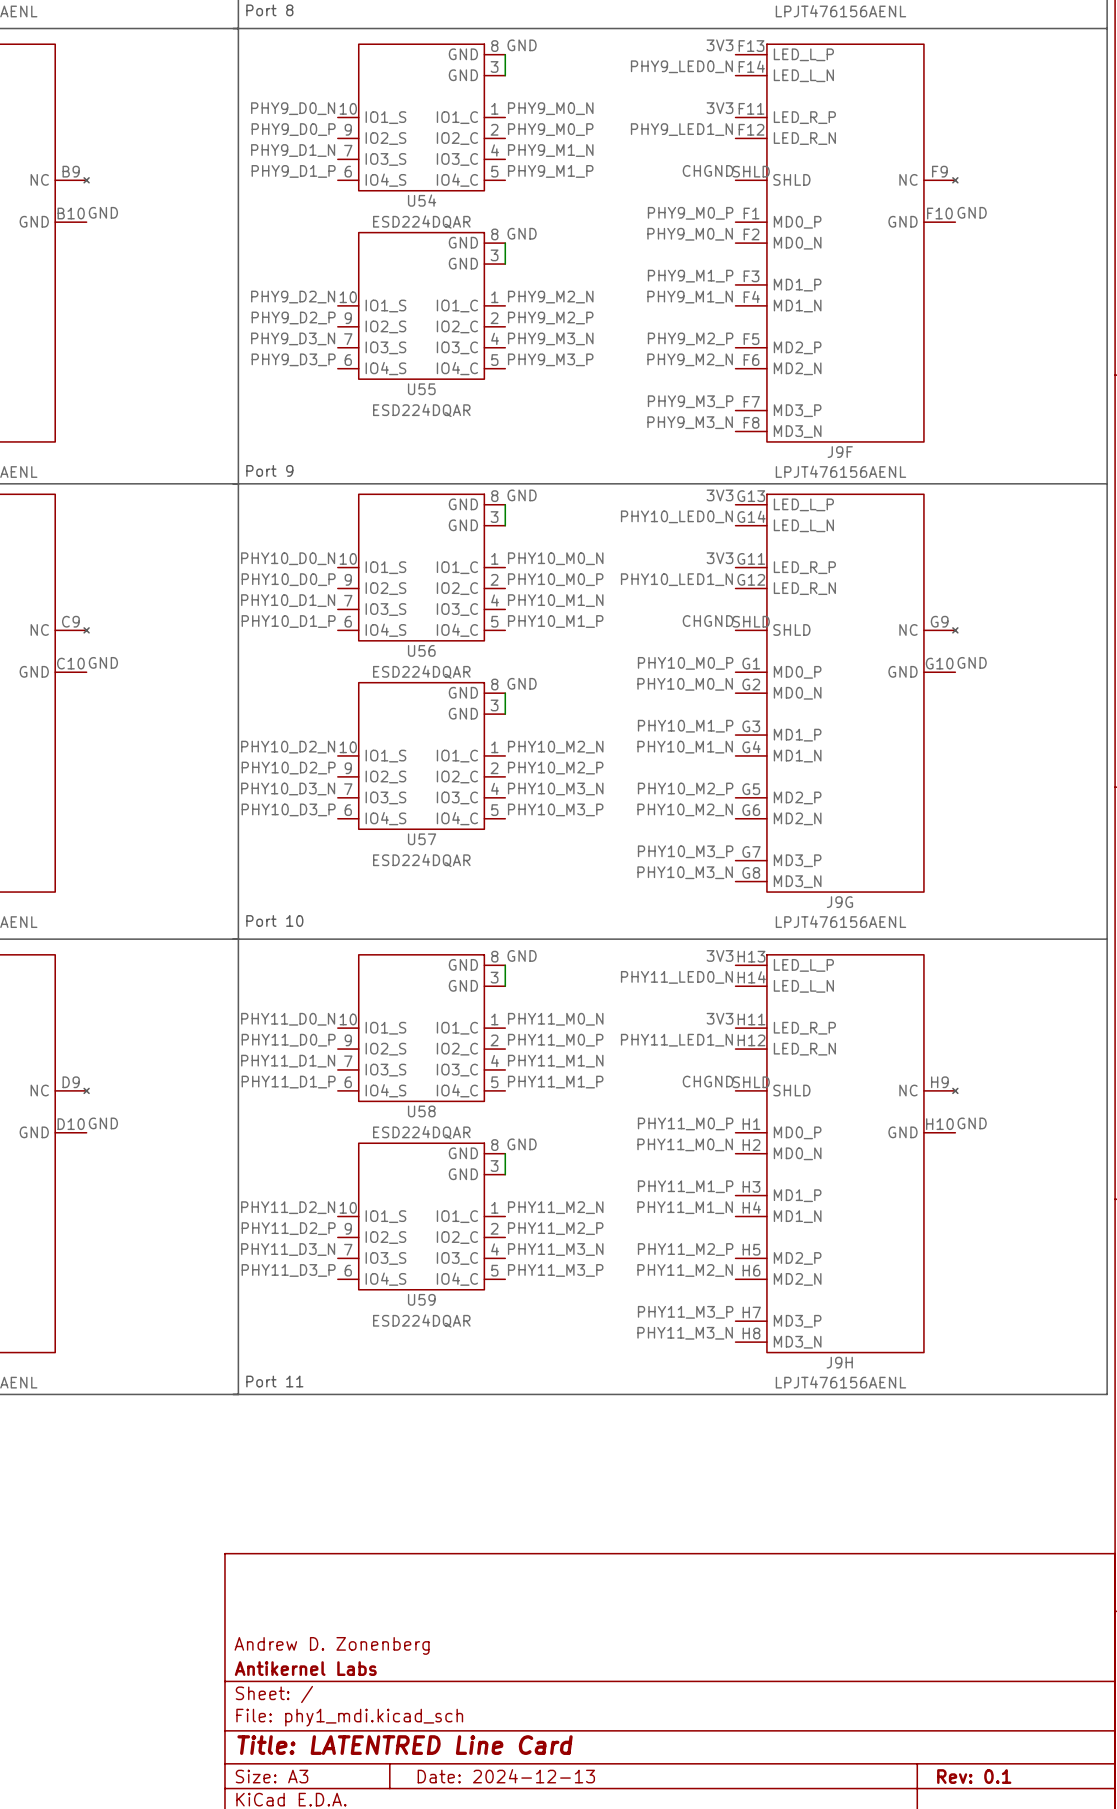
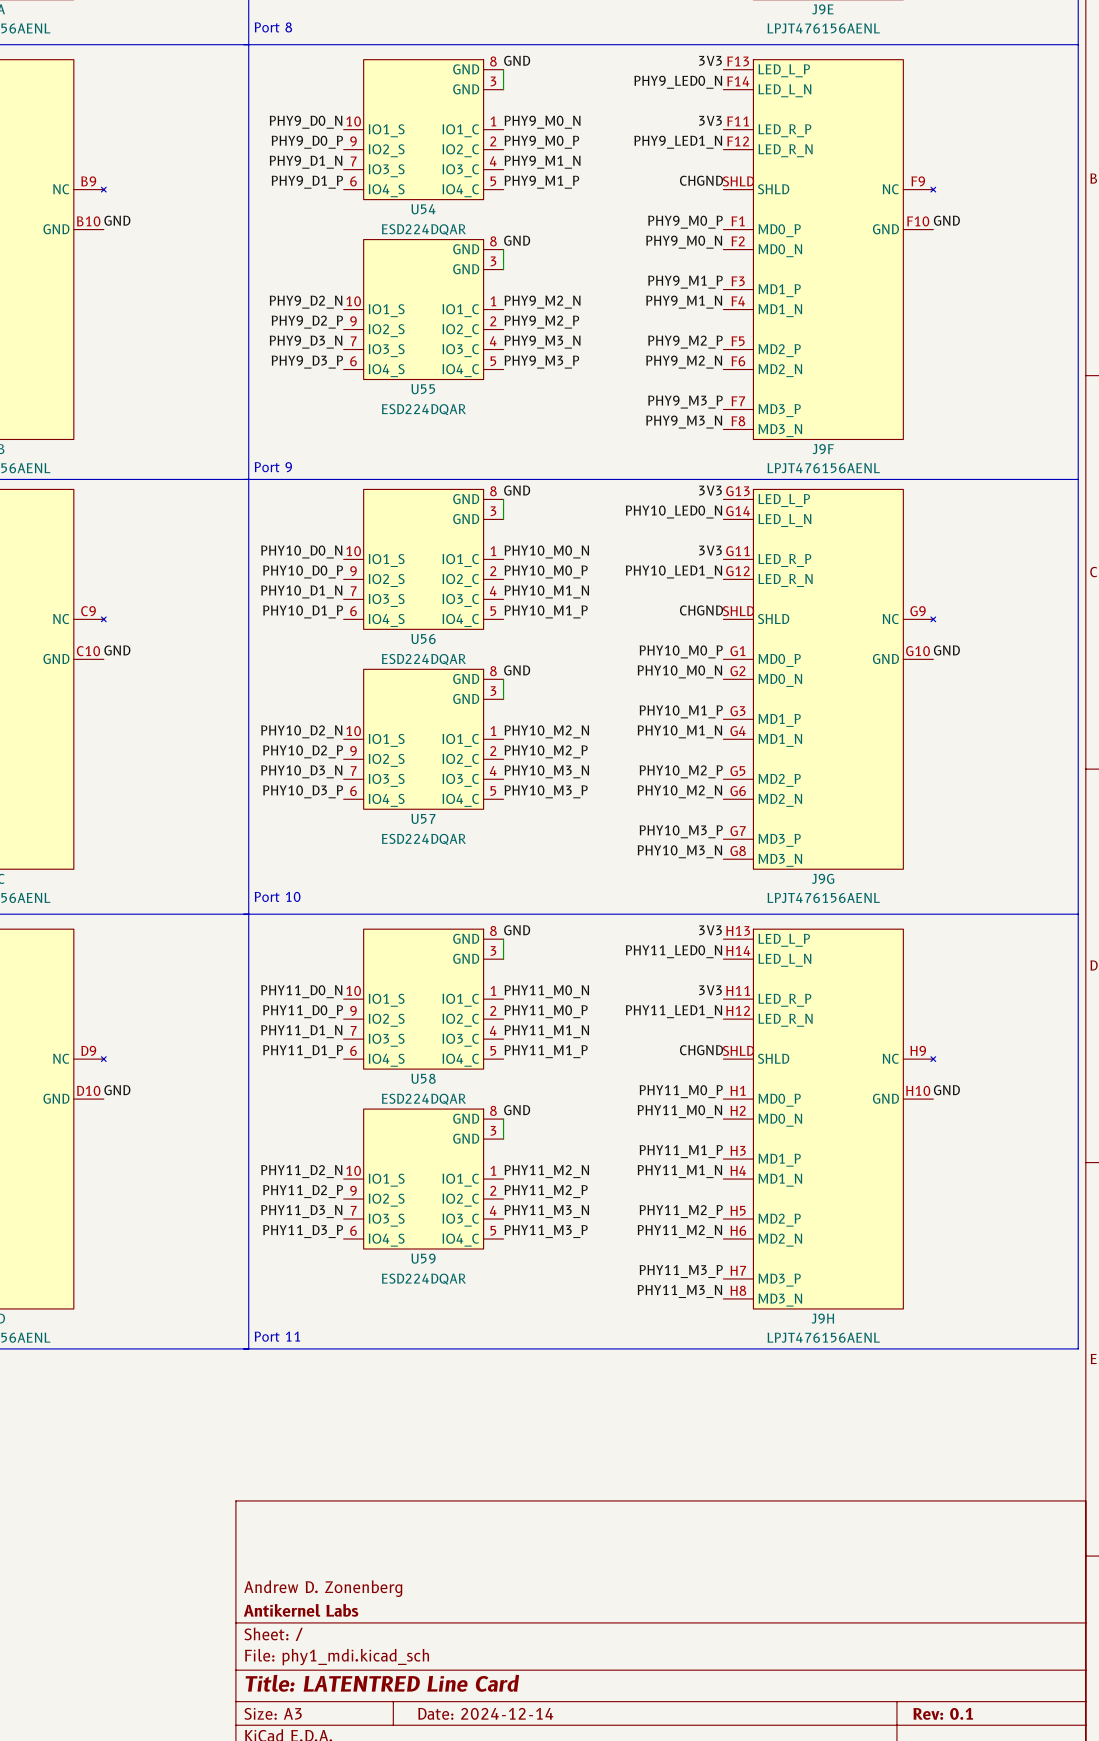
title block: Date: 2024-12-13 (506, 1776) -> Date: 2024-12-14 (485, 1713)

